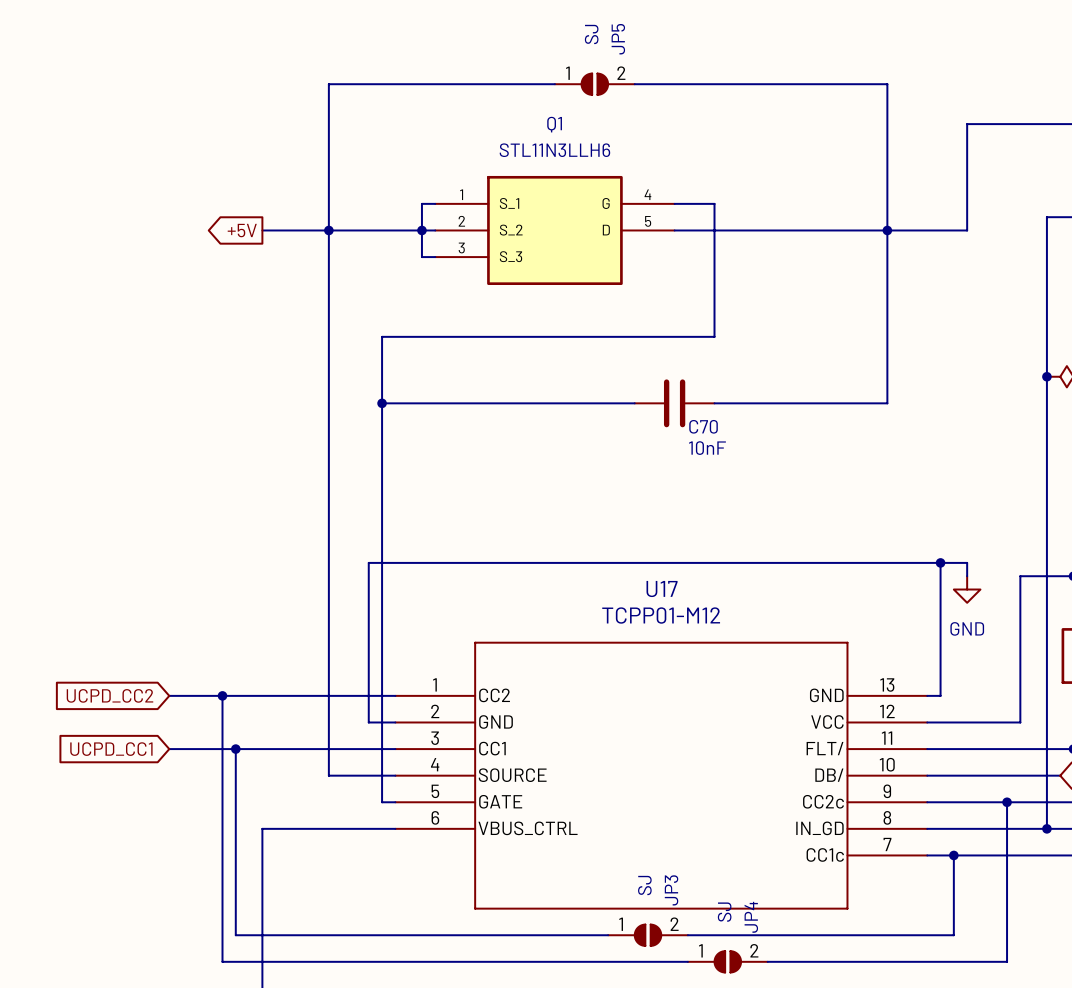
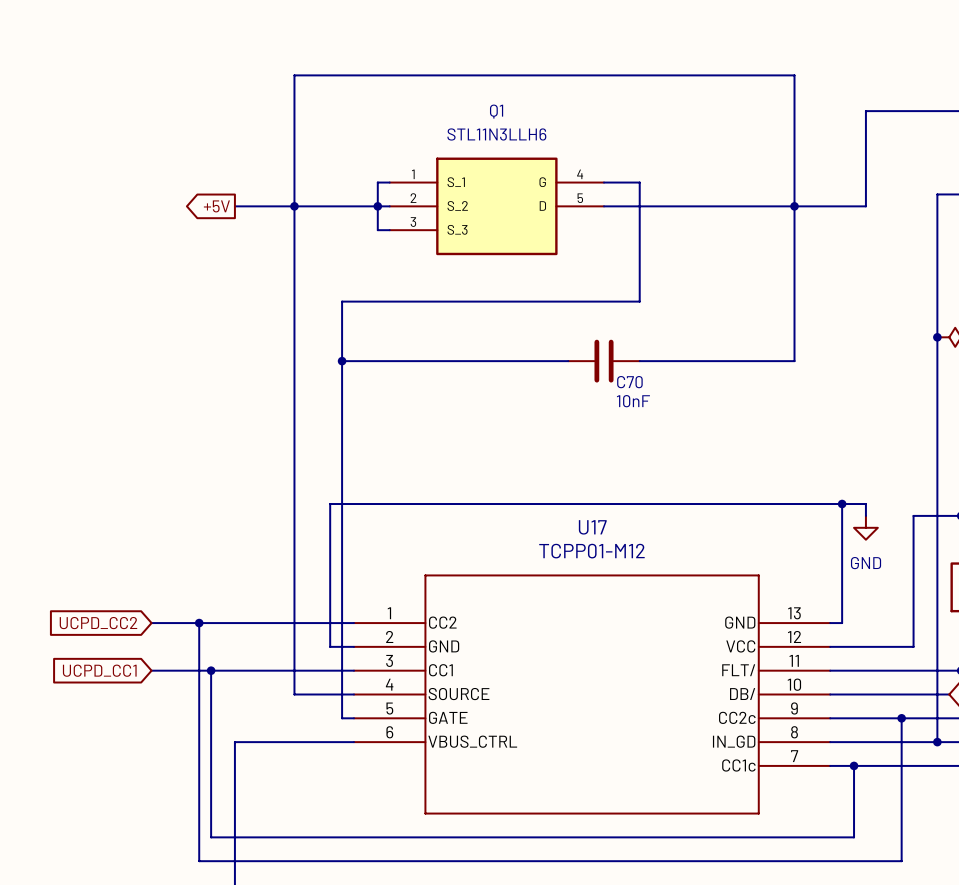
JP5: SJ (594, 84) -> none
JP3: SJ (648, 935) -> none
JP4: SJ (727, 961) -> none

